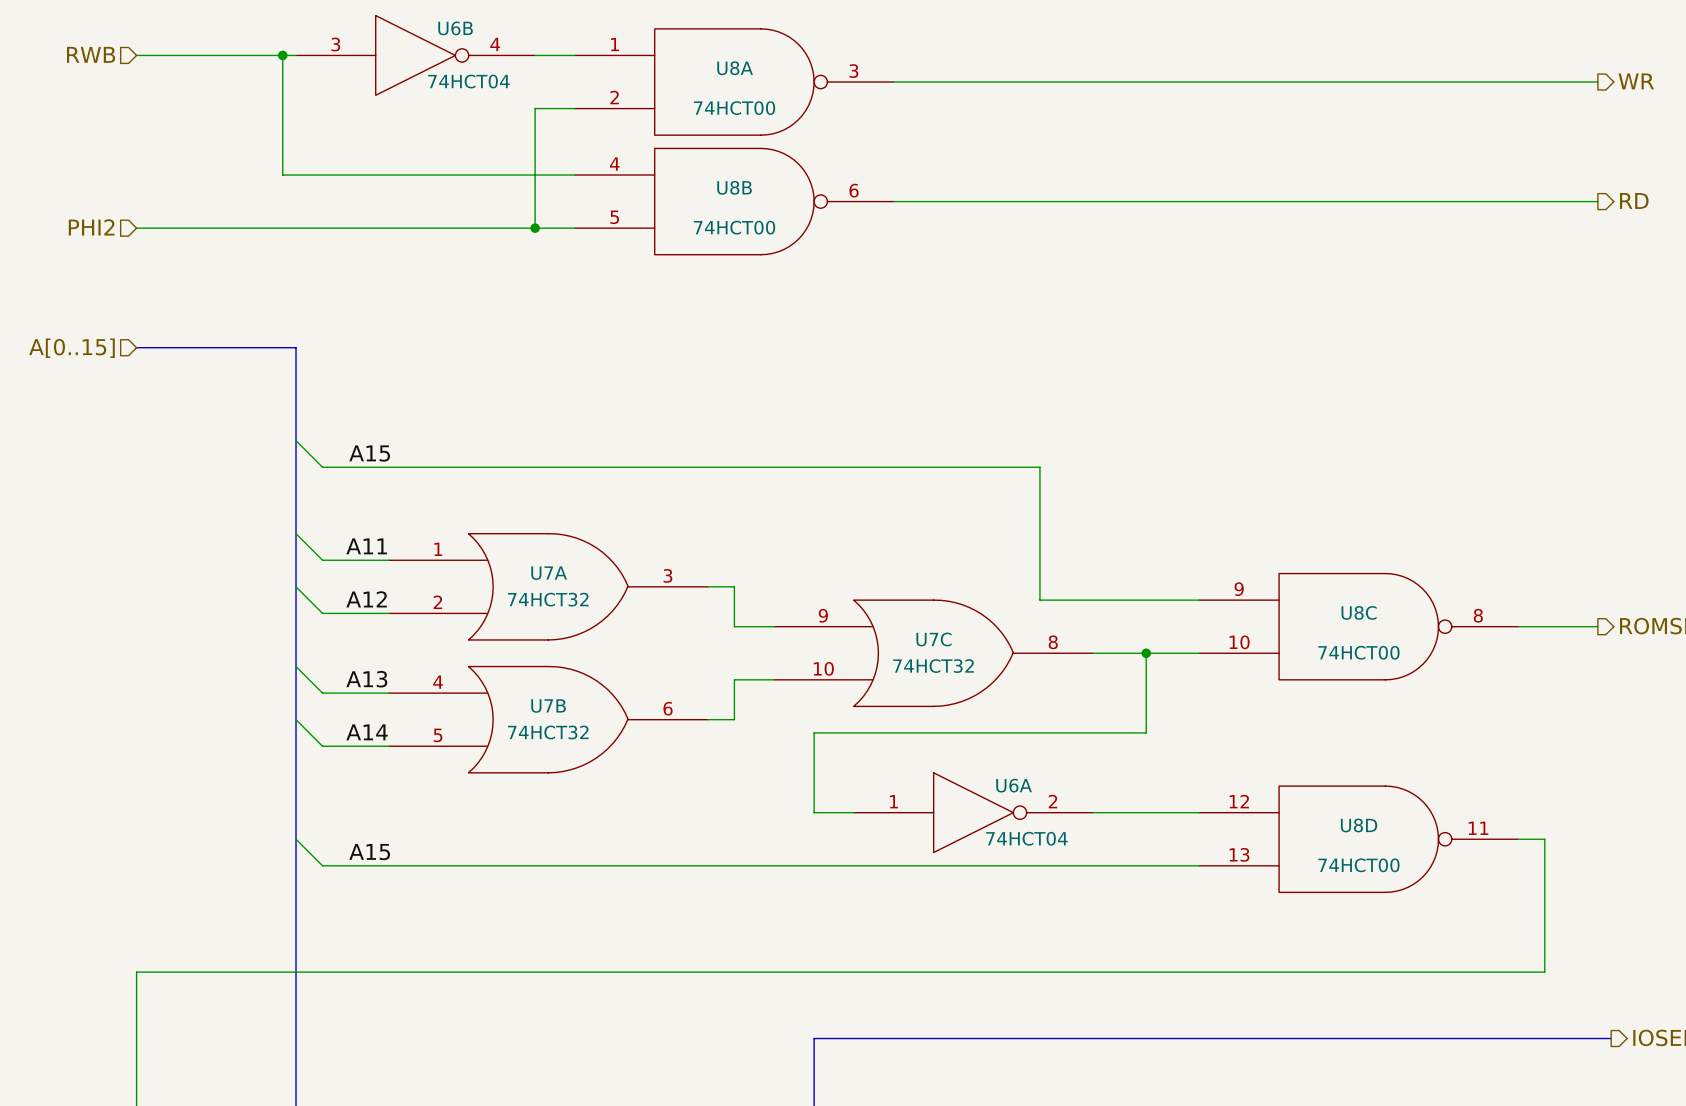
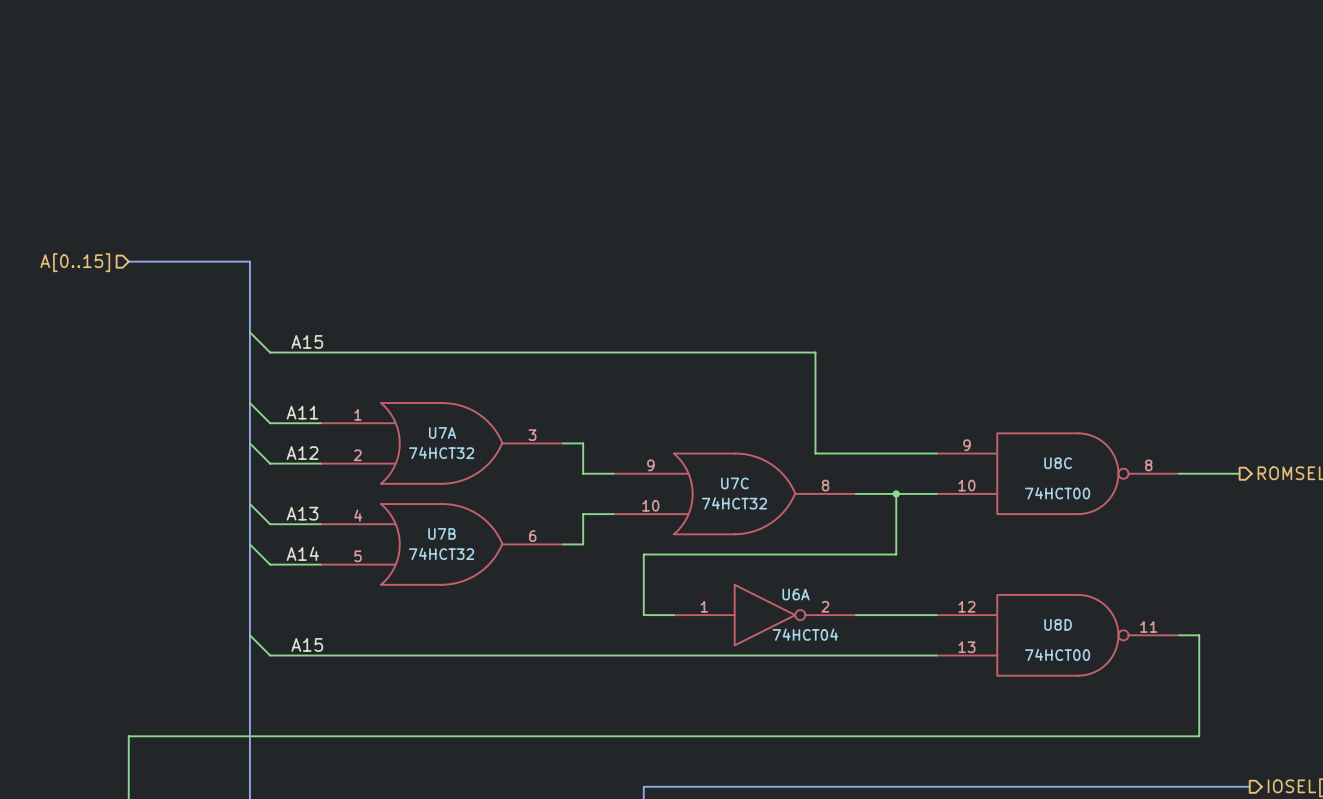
hierarchical label: RWB (91, 54) -> none
wire: (136, 55) (296, 55) -> none
wire: (282, 55) (282, 175) (574, 175) -> none
junction: (282, 55) -> none
U6B: 74HCT04 (415, 55) -> none
wire: (535, 55) (574, 55) -> none
hierarchical label: WR (1636, 81) -> none
U8A: 74HCT00 (734, 82) -> none
wire: (893, 82) (1597, 82) -> none
wire: (574, 108) (535, 108) (535, 228) -> none
hierarchical label: RD (1634, 200) -> none
U8B: 74HCT00 (734, 201) -> none
wire: (893, 201) (1597, 201) -> none
hierarchical label: PHI2 (91, 227) -> none
wire: (136, 228) (574, 228) -> none
junction: (535, 228) -> none

